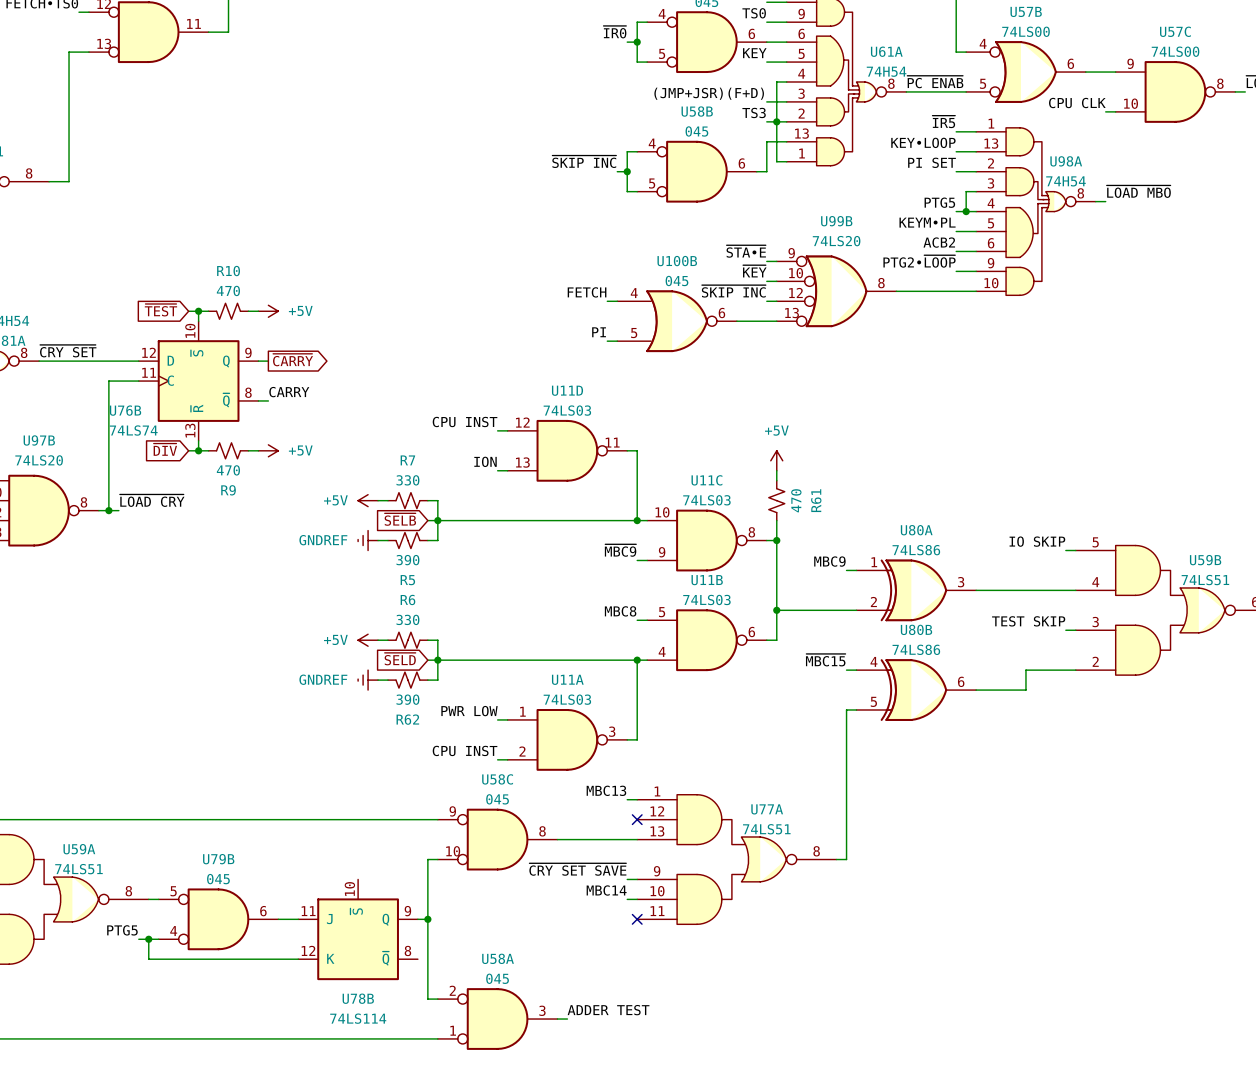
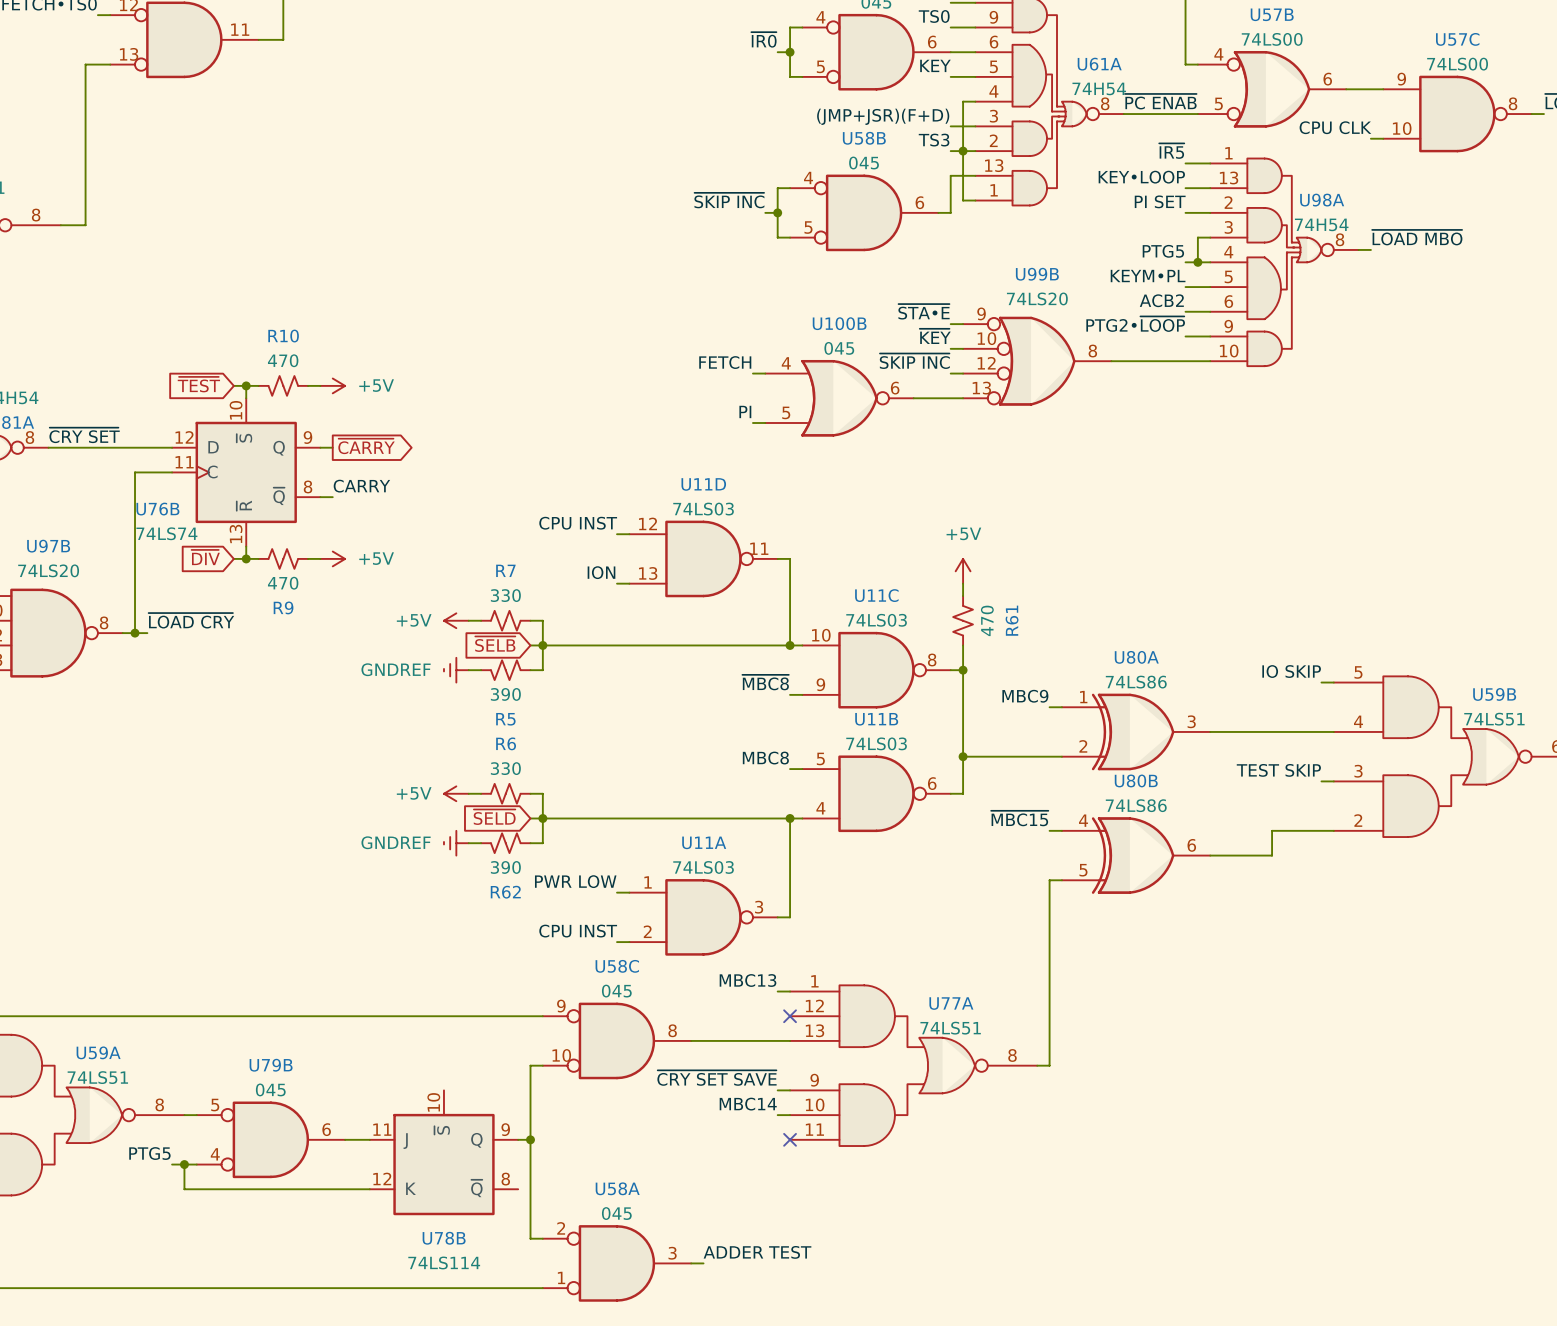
label: ~{MBC9} (620, 550) -> ~{MBC8} (765, 682)

